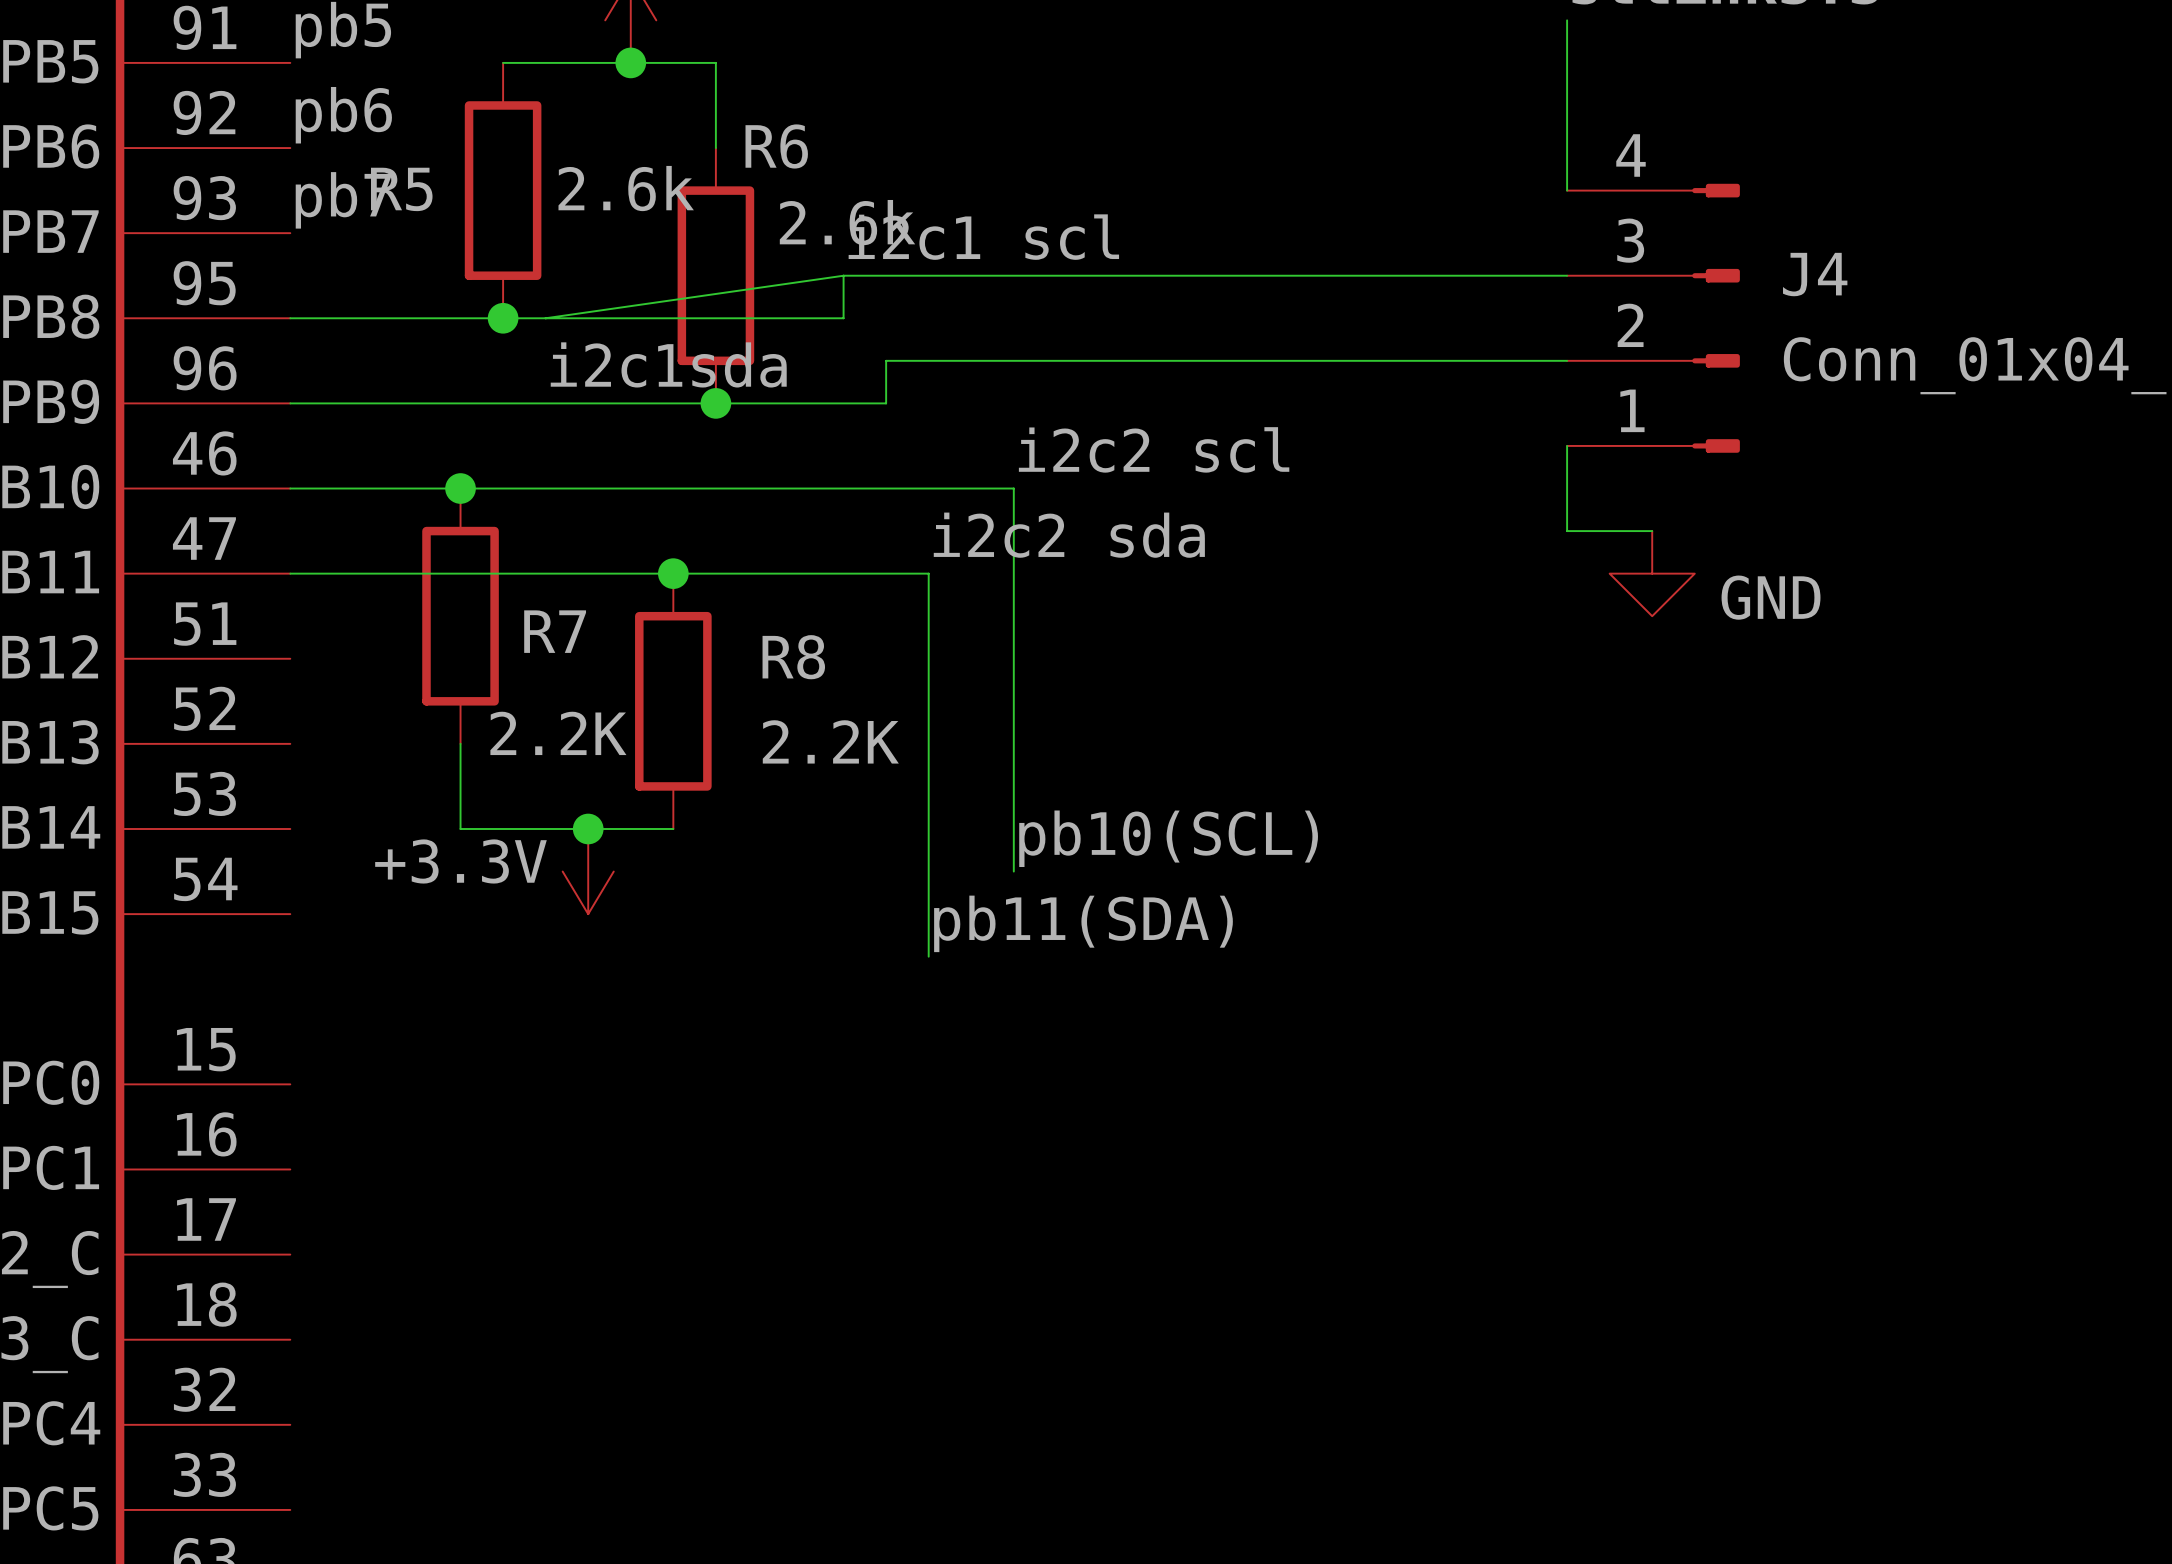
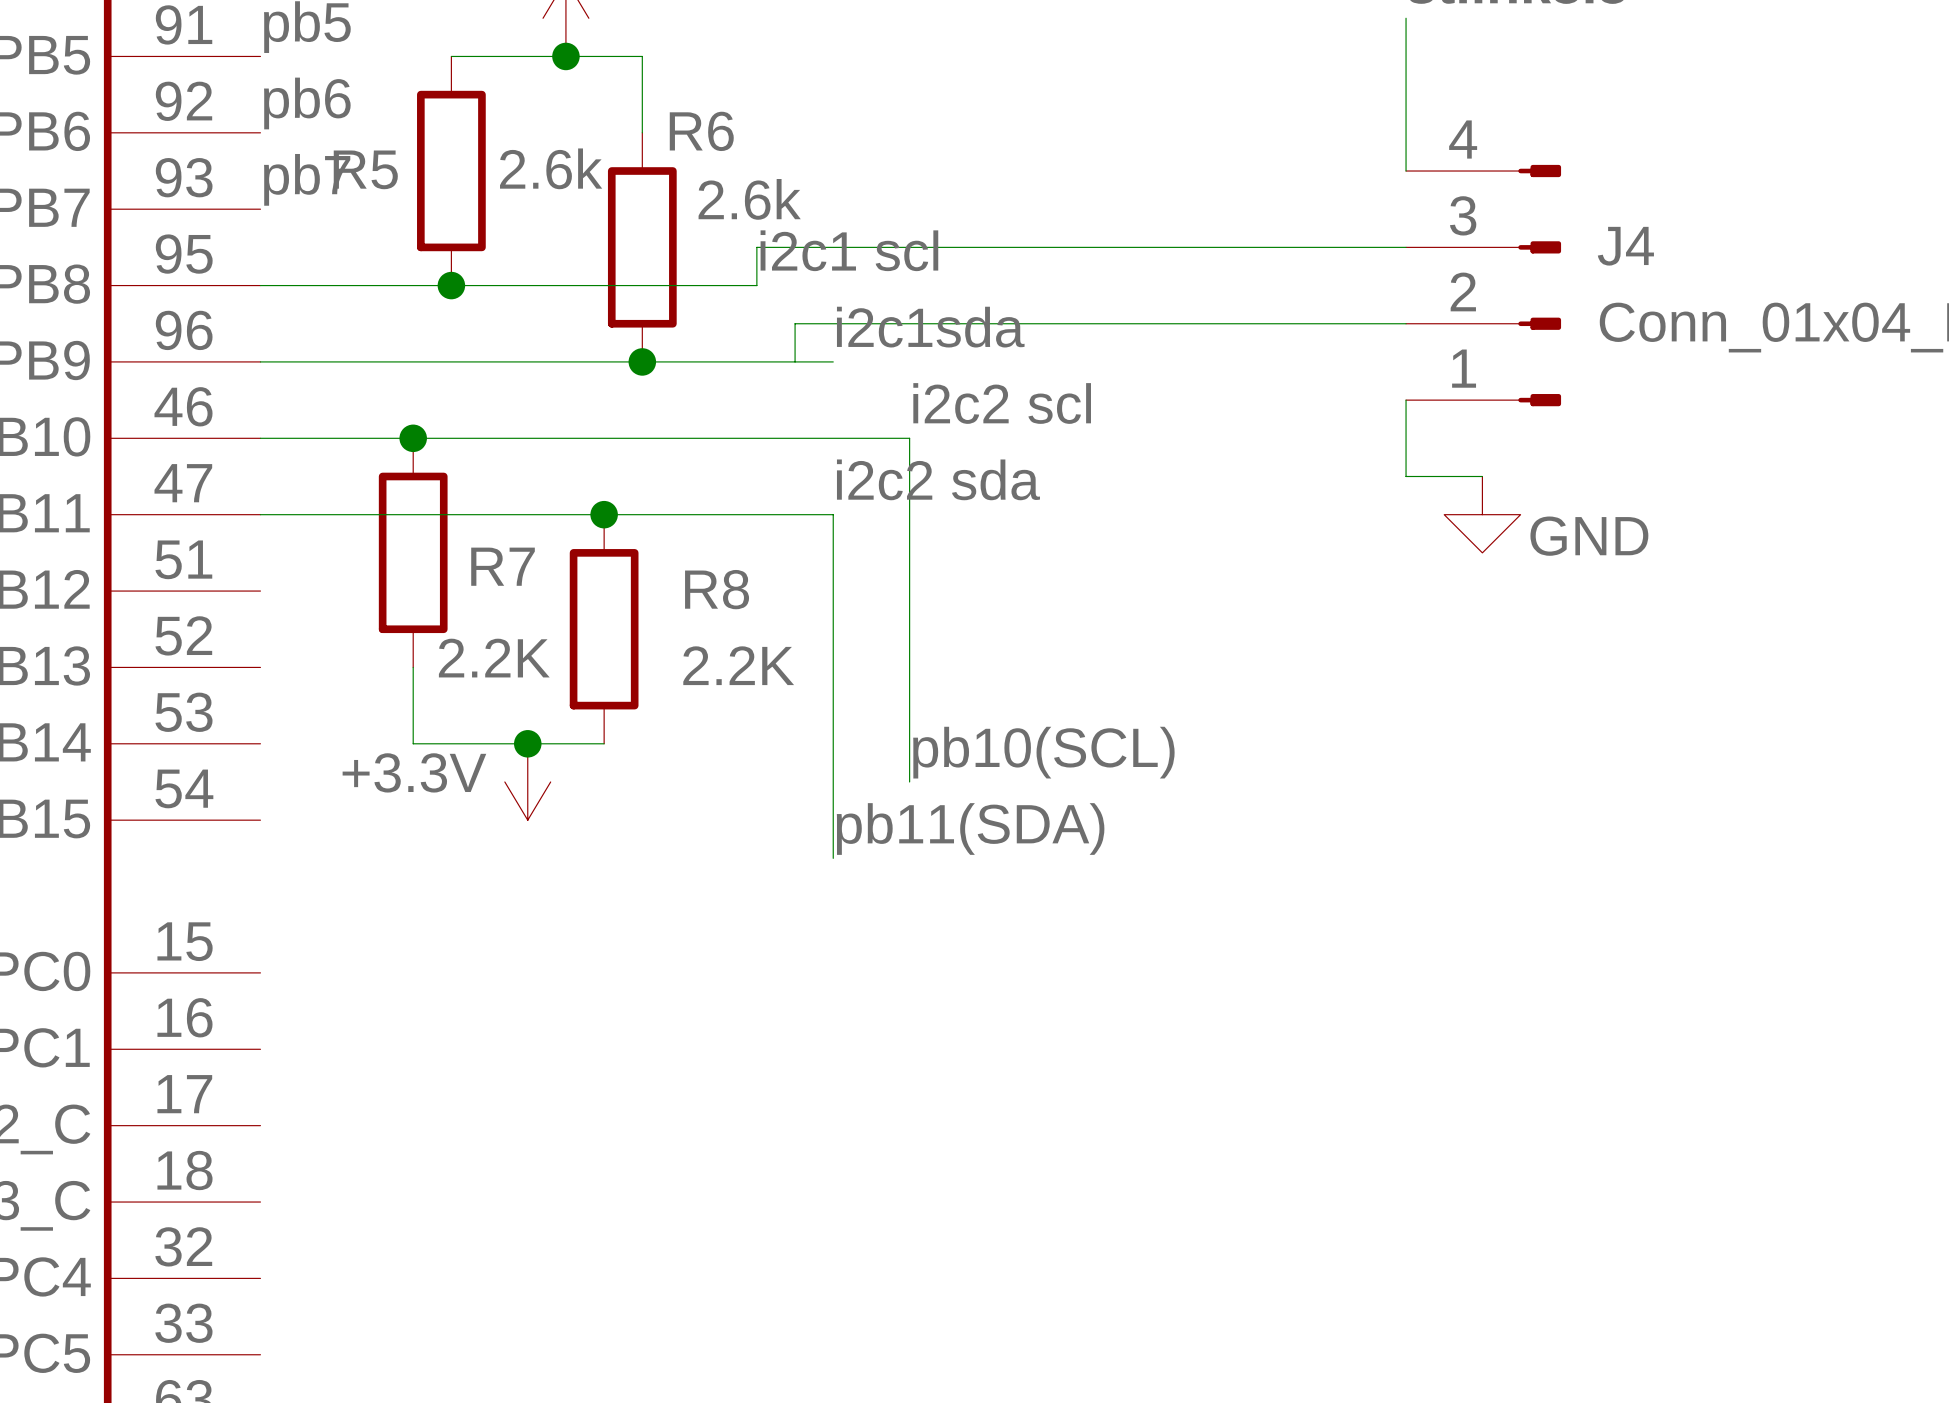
label position: i2c1 scl (983, 237) -> i2c1 scl (849, 250)
wire: (843, 275) (545, 318) -> none
label position: i2c1sda (668, 364) -> i2c1sda (930, 327)
wire: none -> (795, 361) (833, 361)

